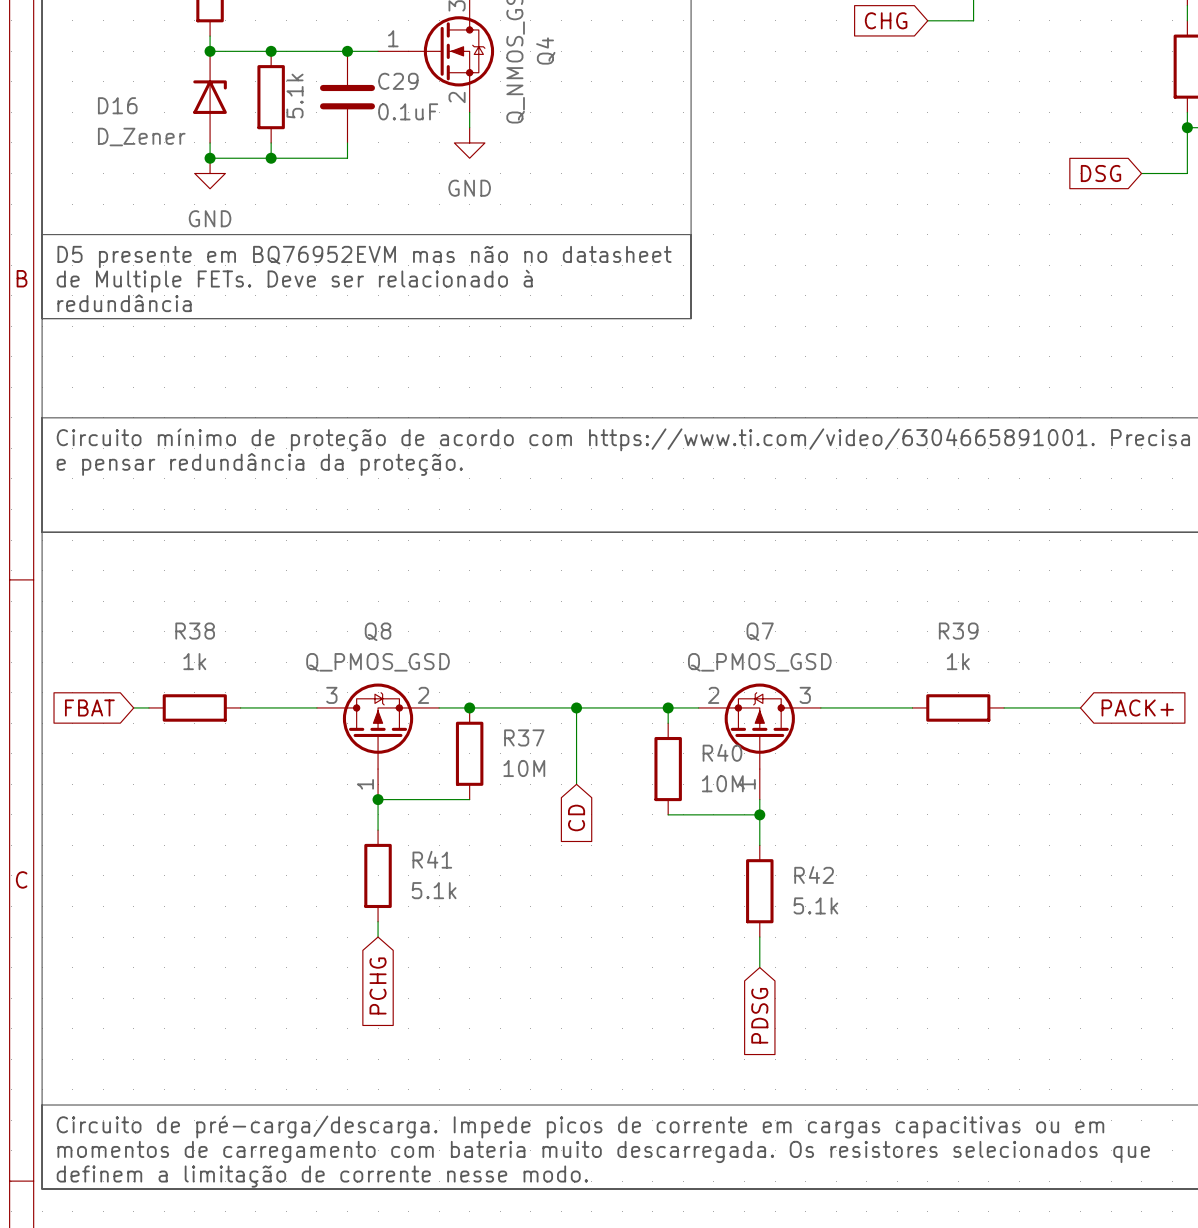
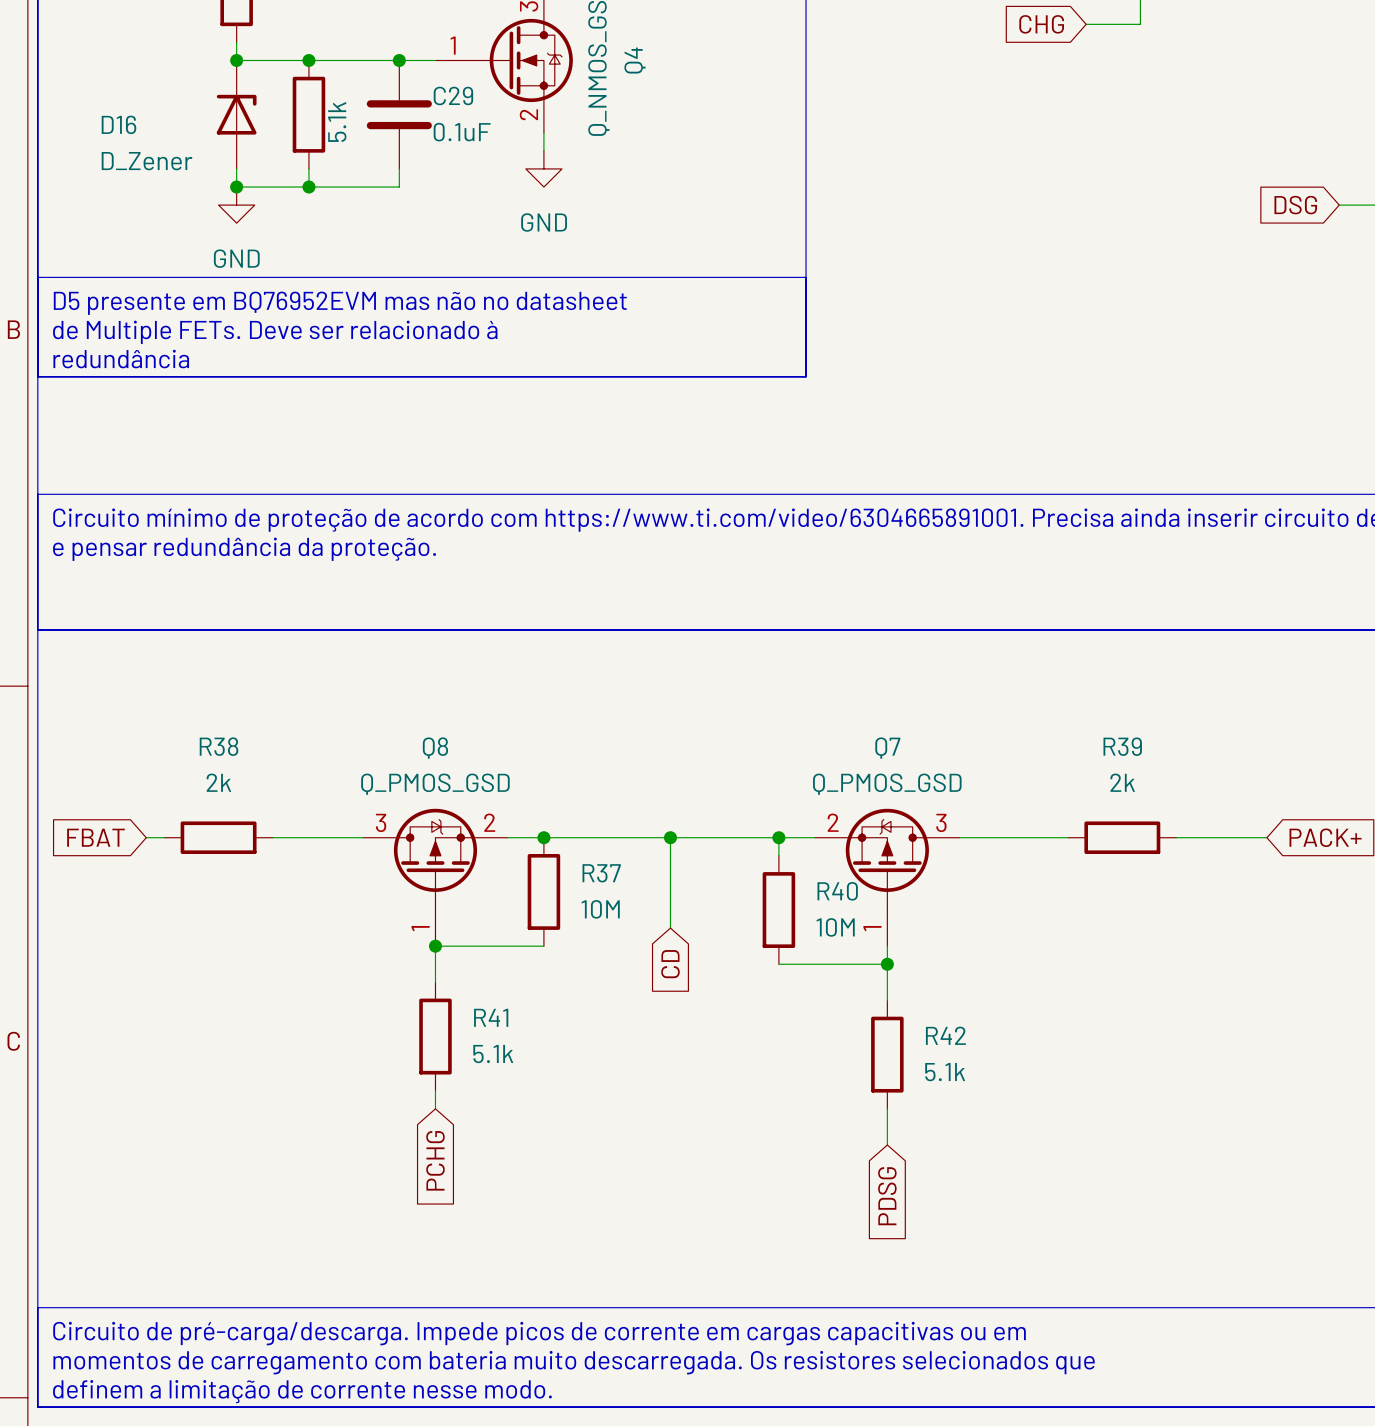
R38 value: 1k (194, 661) -> 2k (218, 782)
R39 value: 1k (958, 661) -> 2k (1122, 782)

